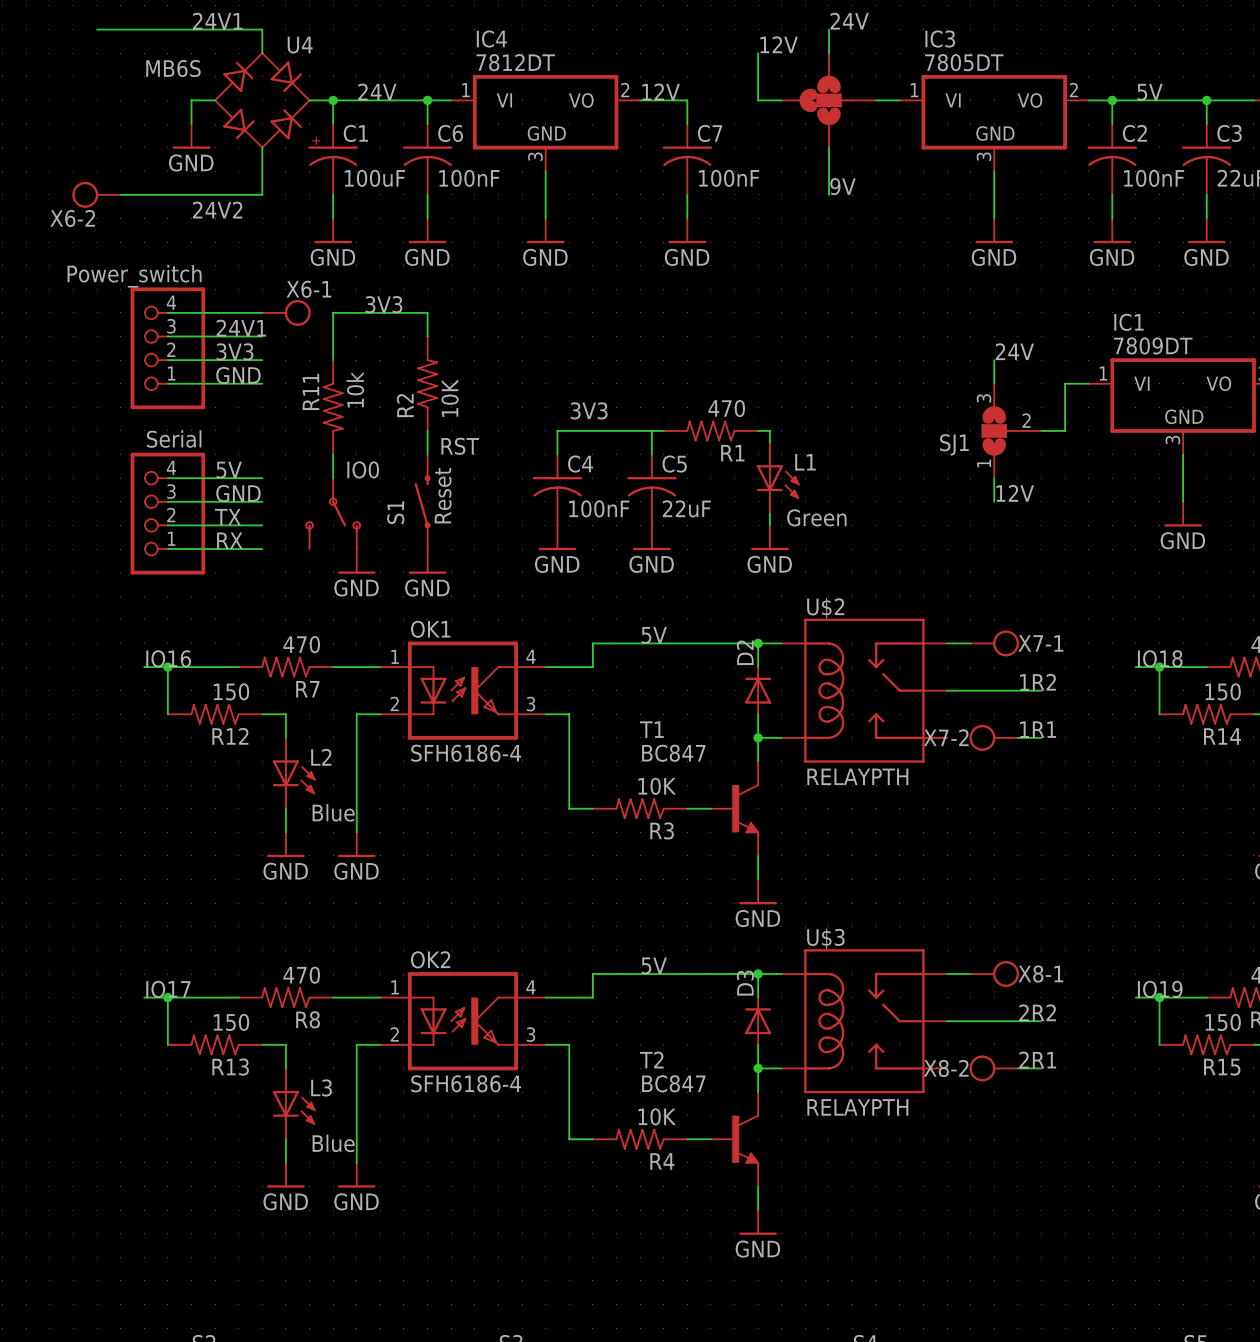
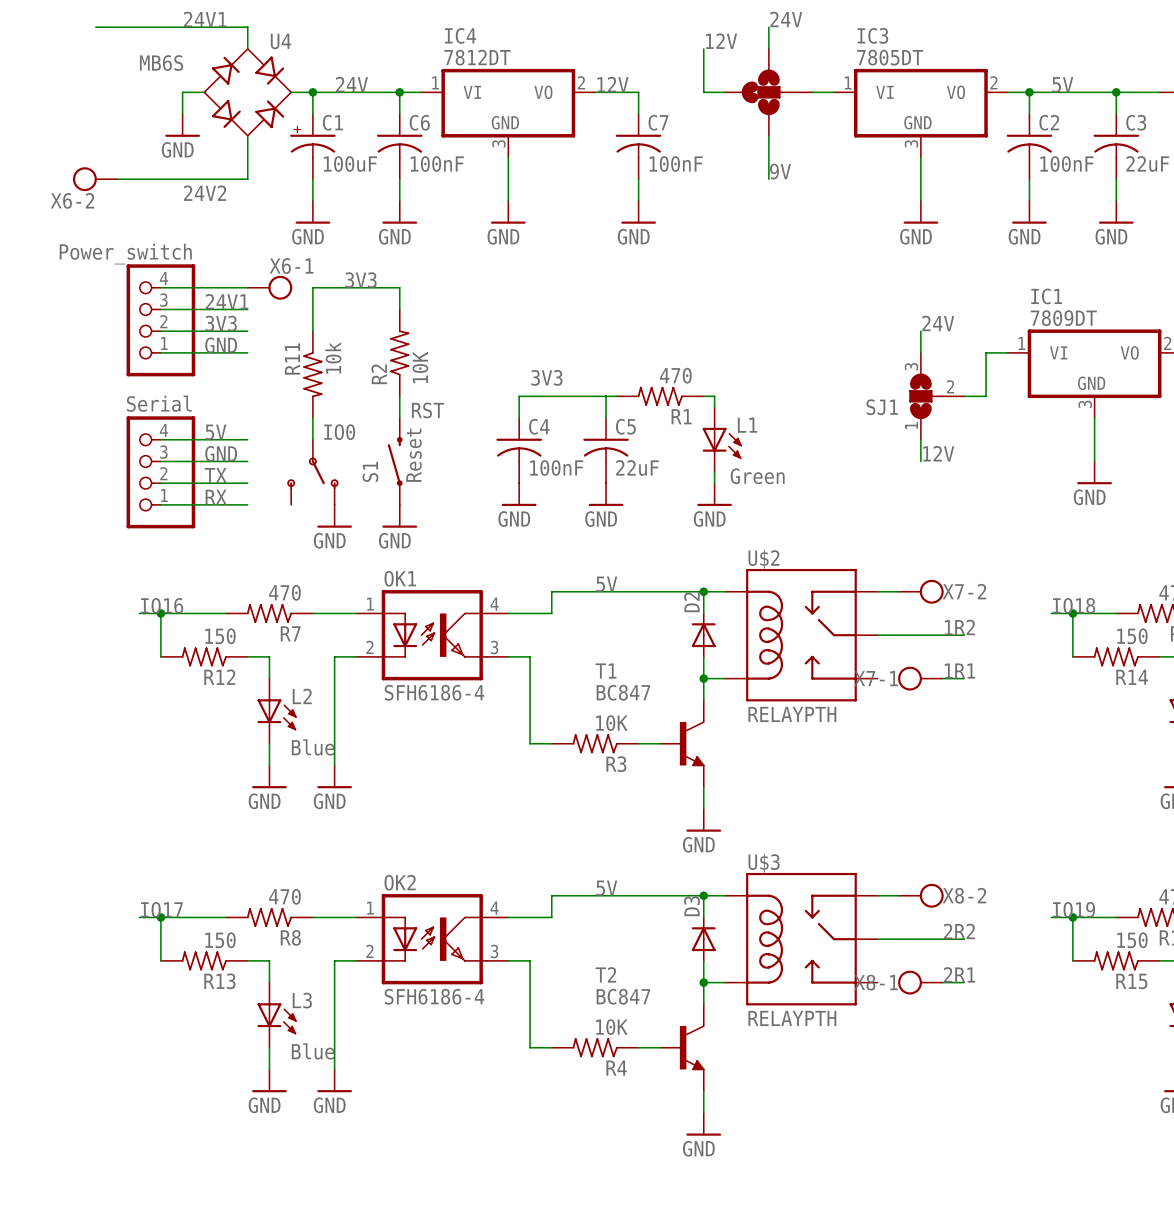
X7-1 name: X7-1 (1040, 643) -> X7-2 (964, 591)
X7-2 name: X7-2 (946, 737) -> X7-1 (876, 678)
X8-1 name: X8-1 (1040, 974) -> X8-2 (964, 895)
X8-2 name: X8-2 (946, 1068) -> X8-1 (876, 982)

